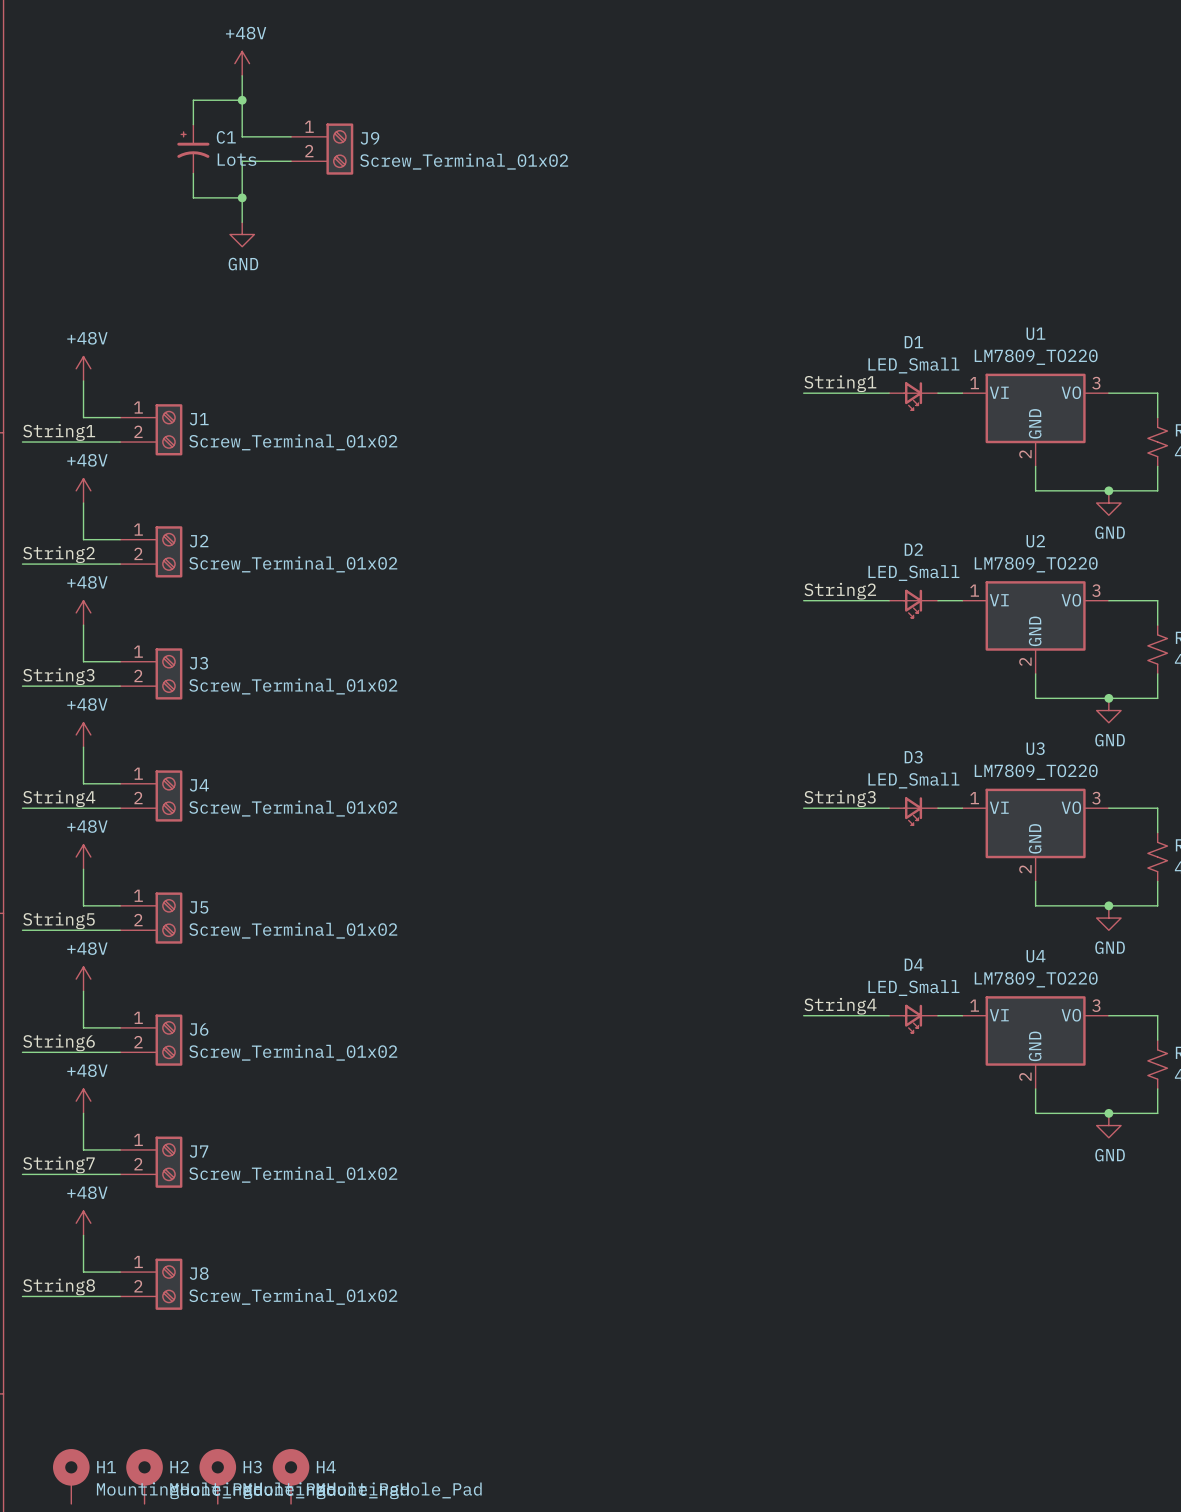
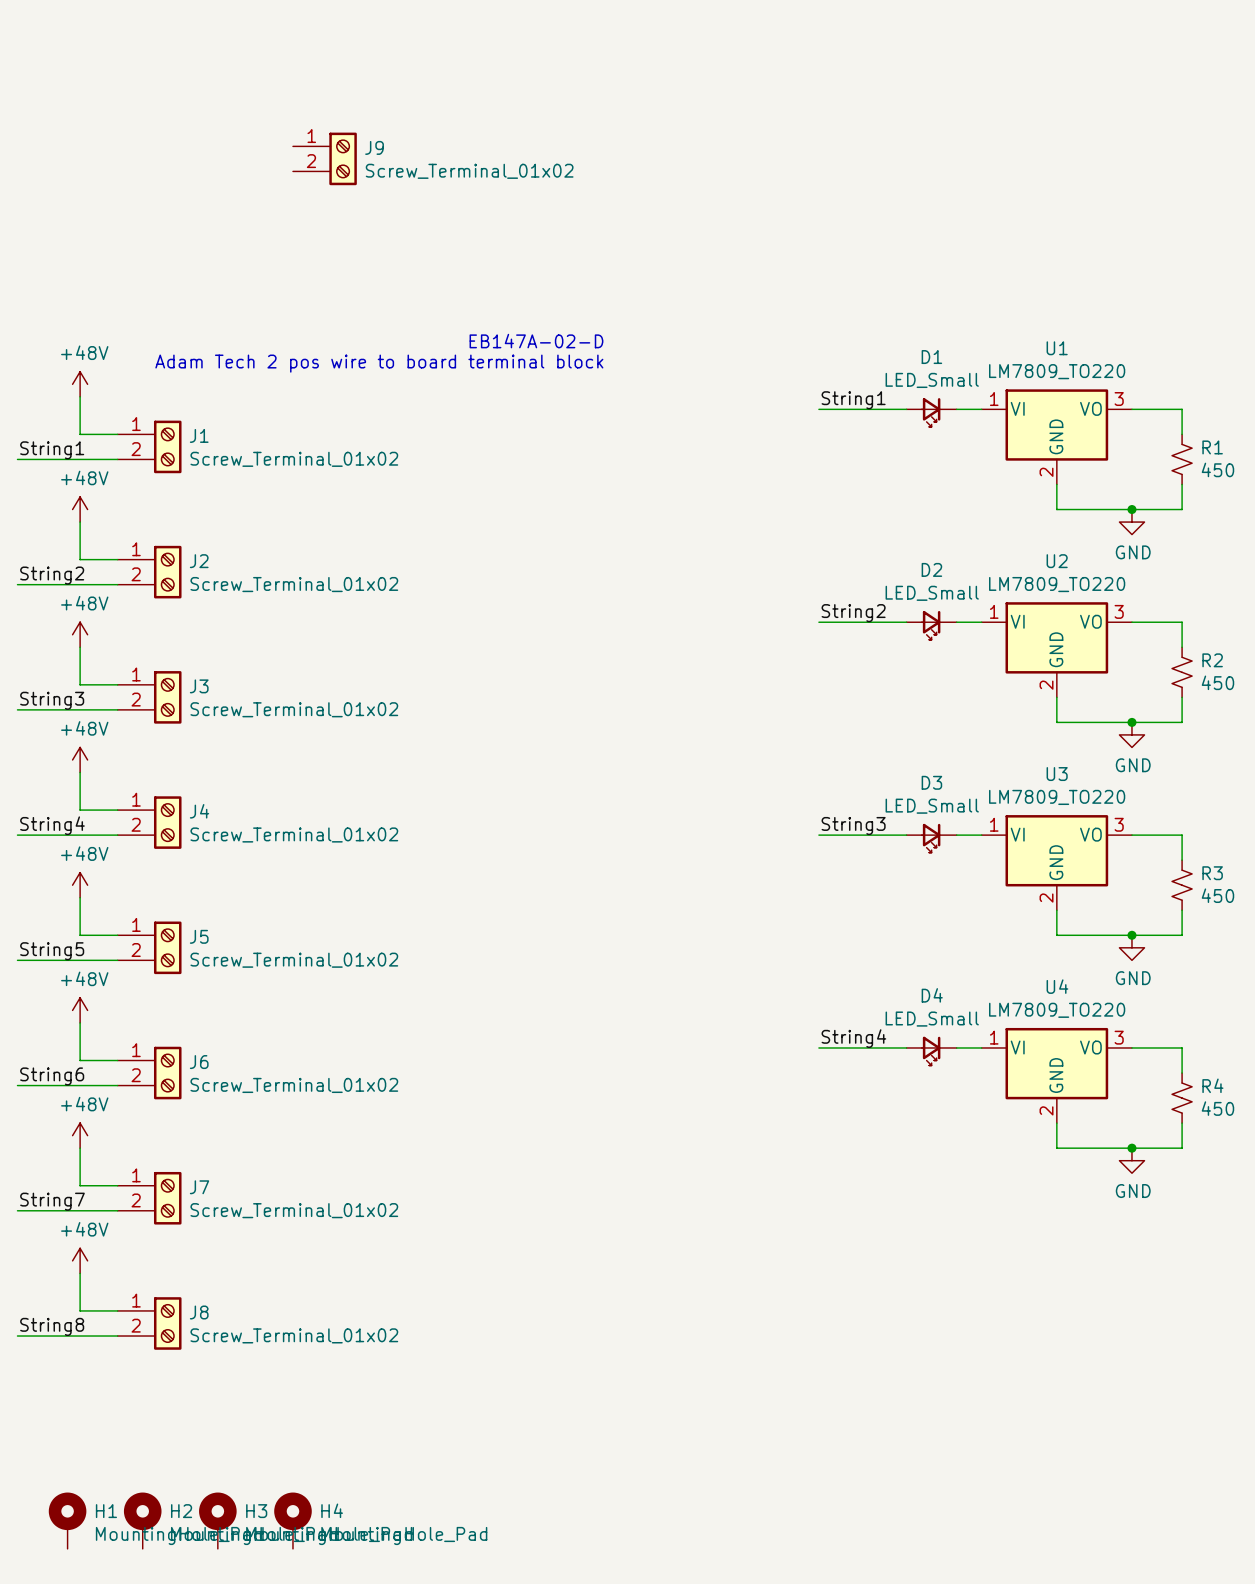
power symbol: +48V (242, 63) -> none
wire: (242, 75) (242, 136) (291, 136) -> none
wire: (242, 100) (193, 100) (193, 124) -> none
junction: (242, 100) -> none
C1: Lots (193, 149) -> none
wire: (291, 161) (242, 161) (242, 222) -> none
wire: (193, 173) (193, 197) (242, 197) -> none
junction: (242, 197) -> none
power symbol: GND (242, 234) -> none
text: none -> EB147A-02-D (536, 341)
text: none -> Adam Tech 2 pos wire to board terminal block (379, 363)

